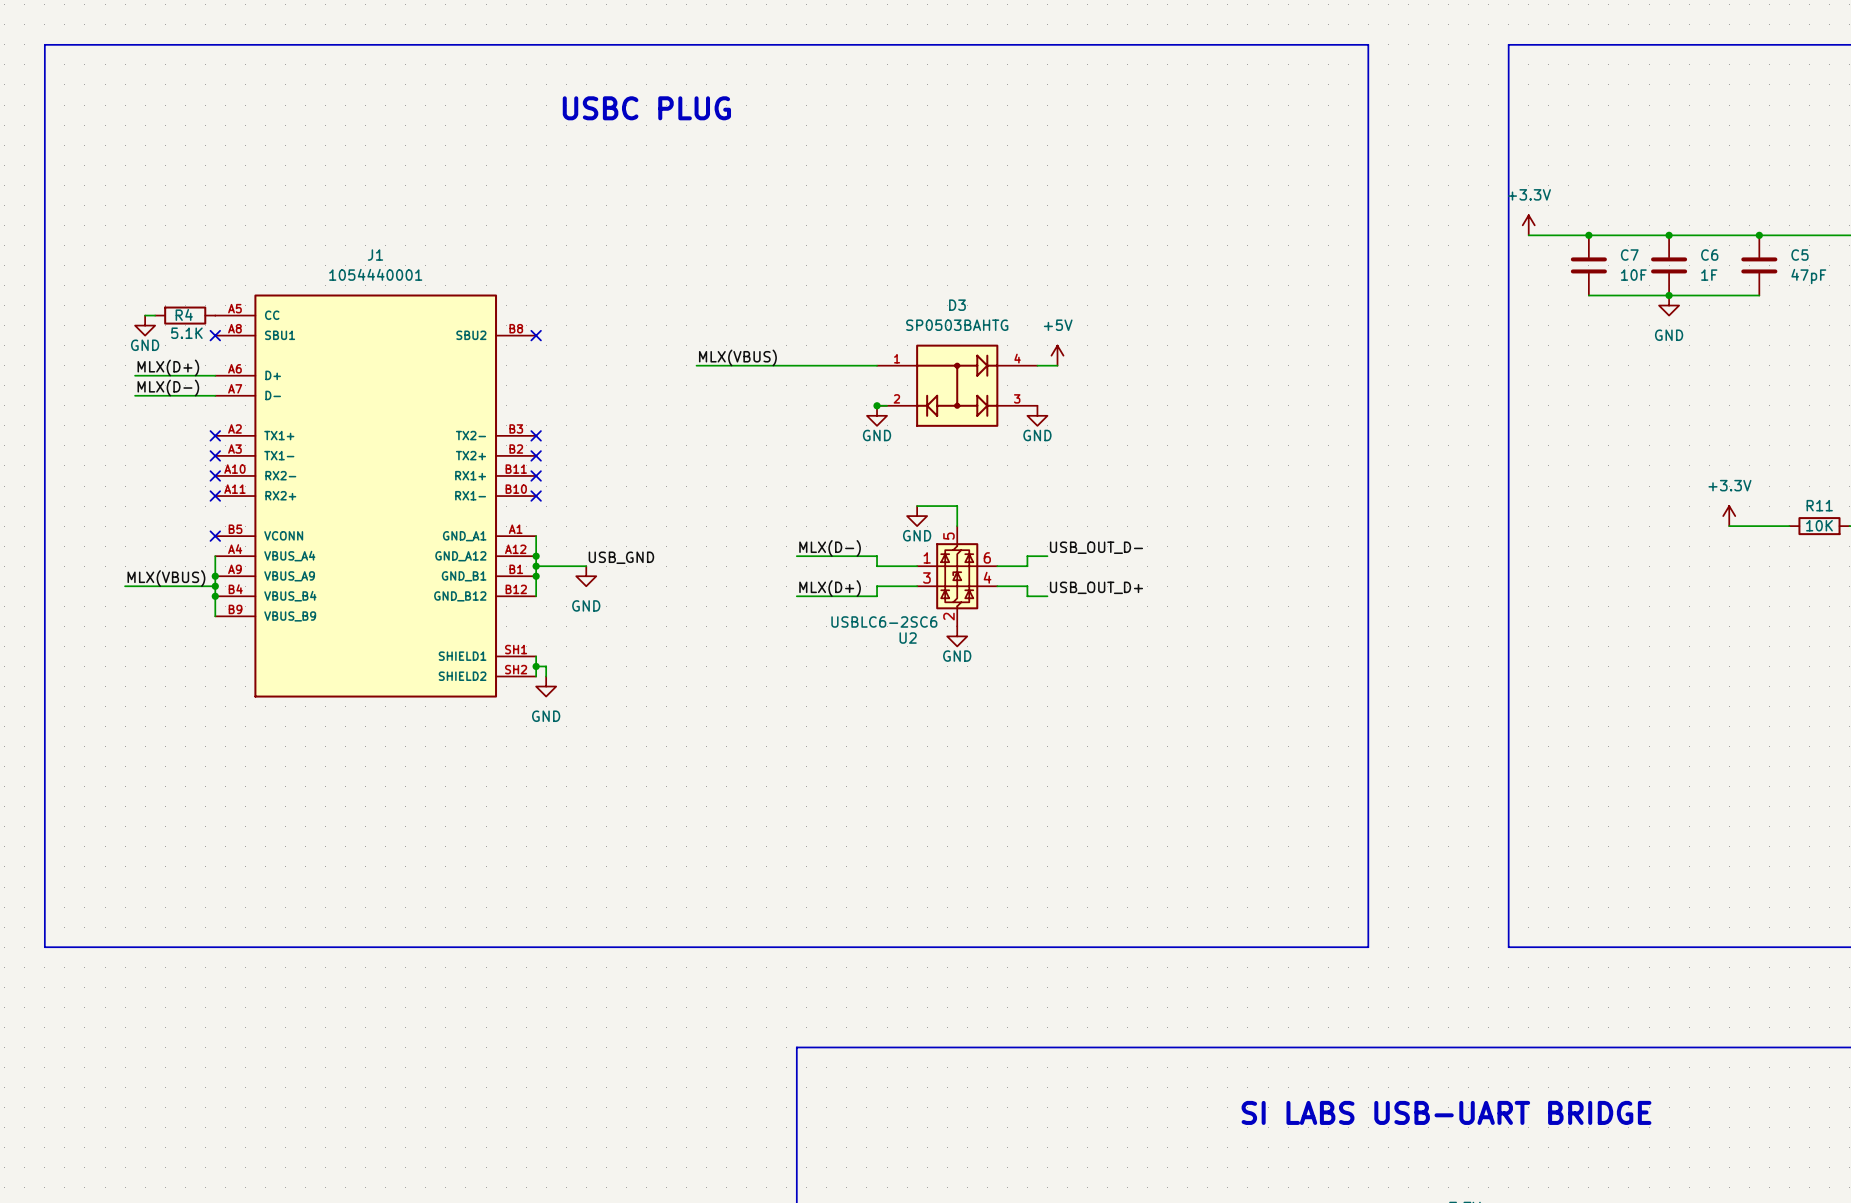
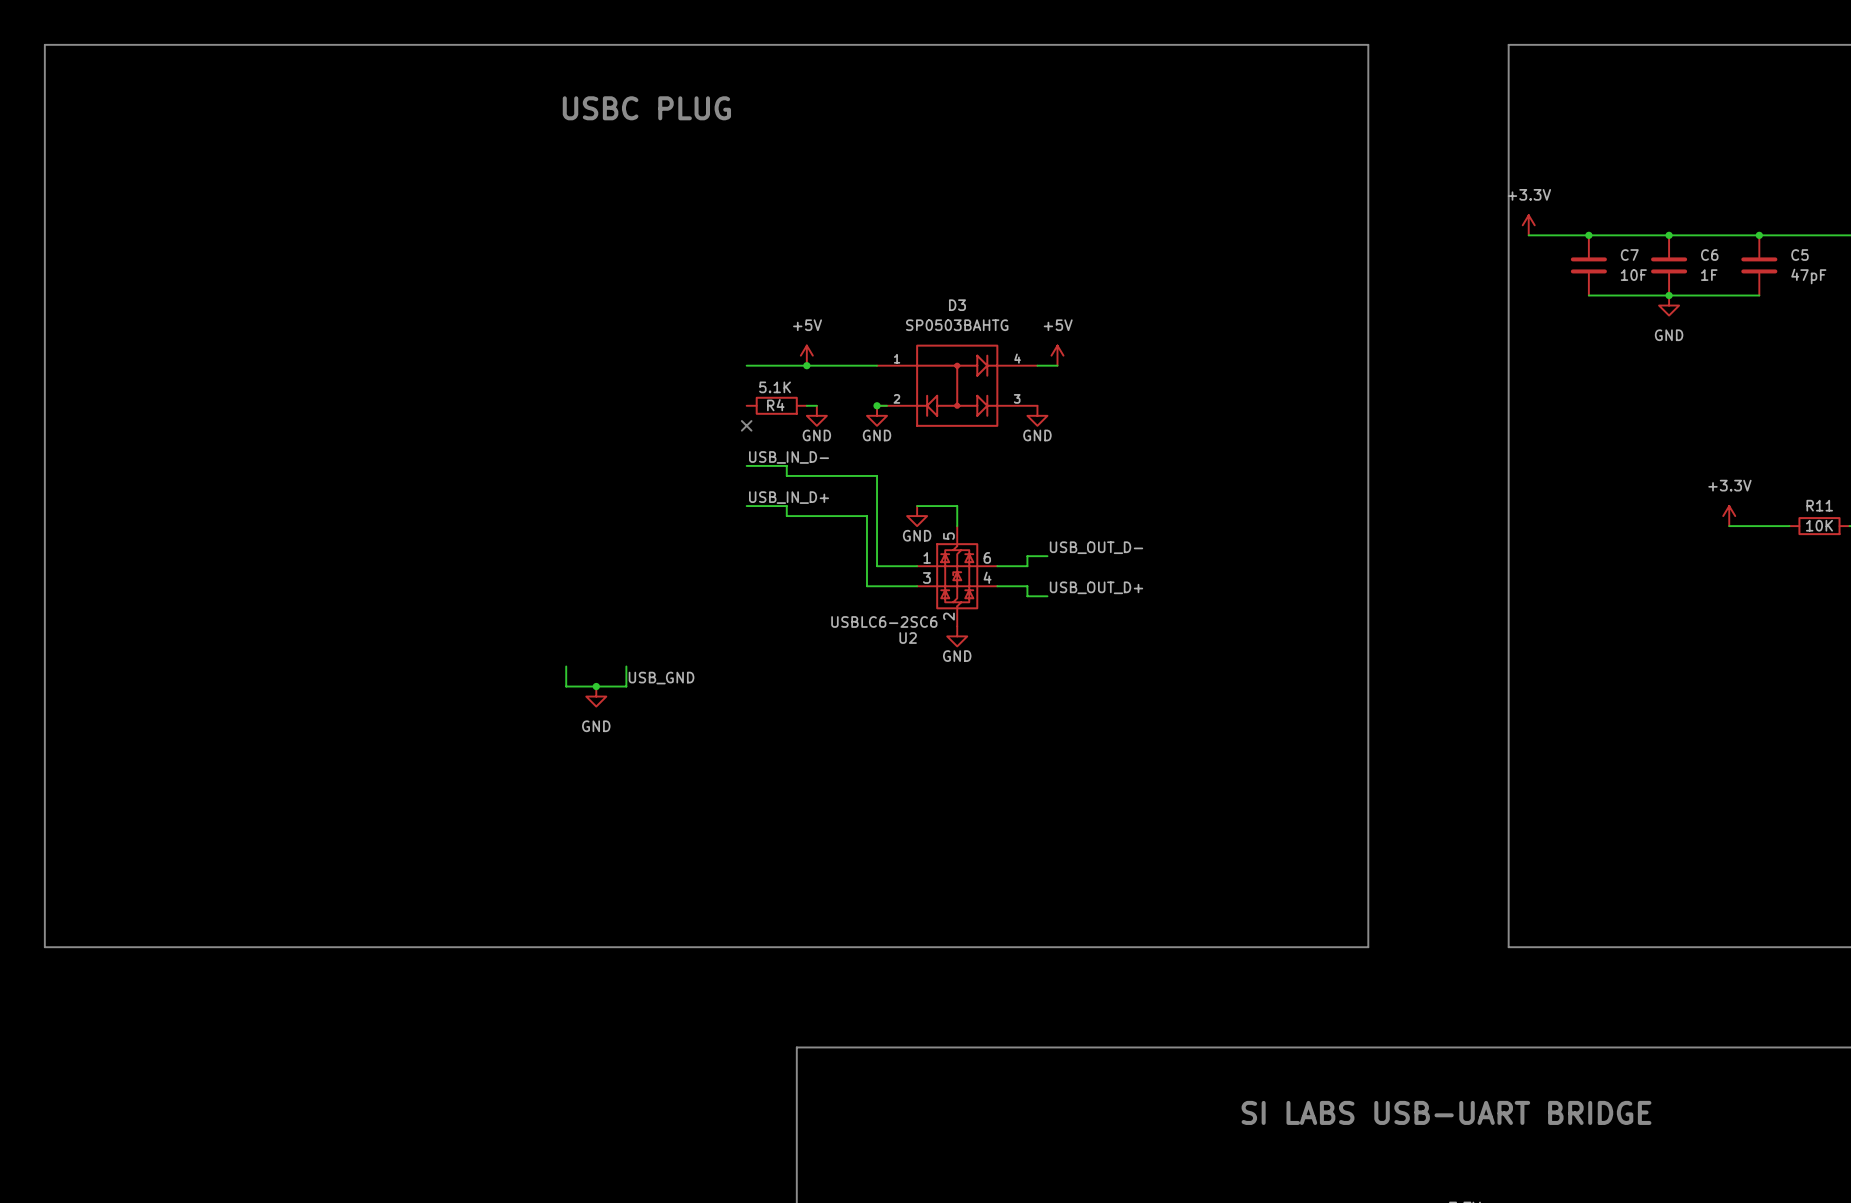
wire: (145, 315) (155, 315) -> none
R4 position: (185, 315) -> (776, 405)
power symbol: GND (145, 325) -> none
R4 value position: 5.1K (186, 333) -> 5.1K (775, 387)
no-connect mark: (215, 335) -> none
no-connect mark: (536, 335) -> none
power symbol: none -> +5V (806, 355)
label: MLX(VBUS) (737, 357) -> none
wire: (696, 365) (746, 365) -> none
junction: none -> (806, 365)
label: MLX(D+) (168, 367) -> none
wire: (135, 375) (215, 375) -> none
label: MLX(D-) (168, 388) -> none
wire: (135, 395) (215, 395) -> none
wire: none -> (806, 405) (816, 405)
power symbol: none -> GND (816, 415)
no-connect mark: none -> (746, 425)
no-connect mark: (215, 435) -> none
no-connect mark: (536, 435) -> none
no-connect mark: (215, 455) -> none
no-connect mark: (536, 455) -> none
label: none -> USB_IN_D- (789, 457)
no-connect mark: (215, 475) -> none
no-connect mark: (536, 475) -> none
no-connect mark: (215, 496) -> none
J1: 1054440001 (375, 496) -> none
no-connect mark: (536, 496) -> none
label: none -> USB_IN_D+ (789, 497)
no-connect mark: (215, 536) -> none
wire: (536, 536) (536, 596) -> none
label: MLX(D-) (830, 548) -> none
wire: (215, 556) (215, 616) -> none
junction: (536, 556) -> none
wire: (796, 556) (877, 556) -> (746, 465) (786, 465) (786, 475) (877, 475) (877, 556)
label position: USB_GND (621, 557) -> USB_GND (661, 678)
wire: (536, 566) (586, 566) -> none
junction: (536, 566) -> none
junction: (215, 576) -> none
junction: (536, 576) -> none
power symbol: GND (586, 576) -> none
label: MLX(VBUS) (166, 578) -> none
wire: (125, 586) (215, 586) -> none
junction: (215, 586) -> none
wire: (877, 586) (877, 596) (796, 596) -> (877, 586) (866, 586) (866, 516) (786, 516) (786, 506) (746, 506)
label: MLX(D+) (830, 588) -> none
junction: (215, 596) -> none
wire: (536, 656) (536, 676) -> none
wire: (536, 666) (546, 666) (546, 676) -> none
junction: (536, 666) -> none
wire: none -> (566, 666) (566, 686) (626, 686) (626, 666)
power symbol position: GND (546, 686) -> GND (596, 696)
junction: none -> (596, 686)

